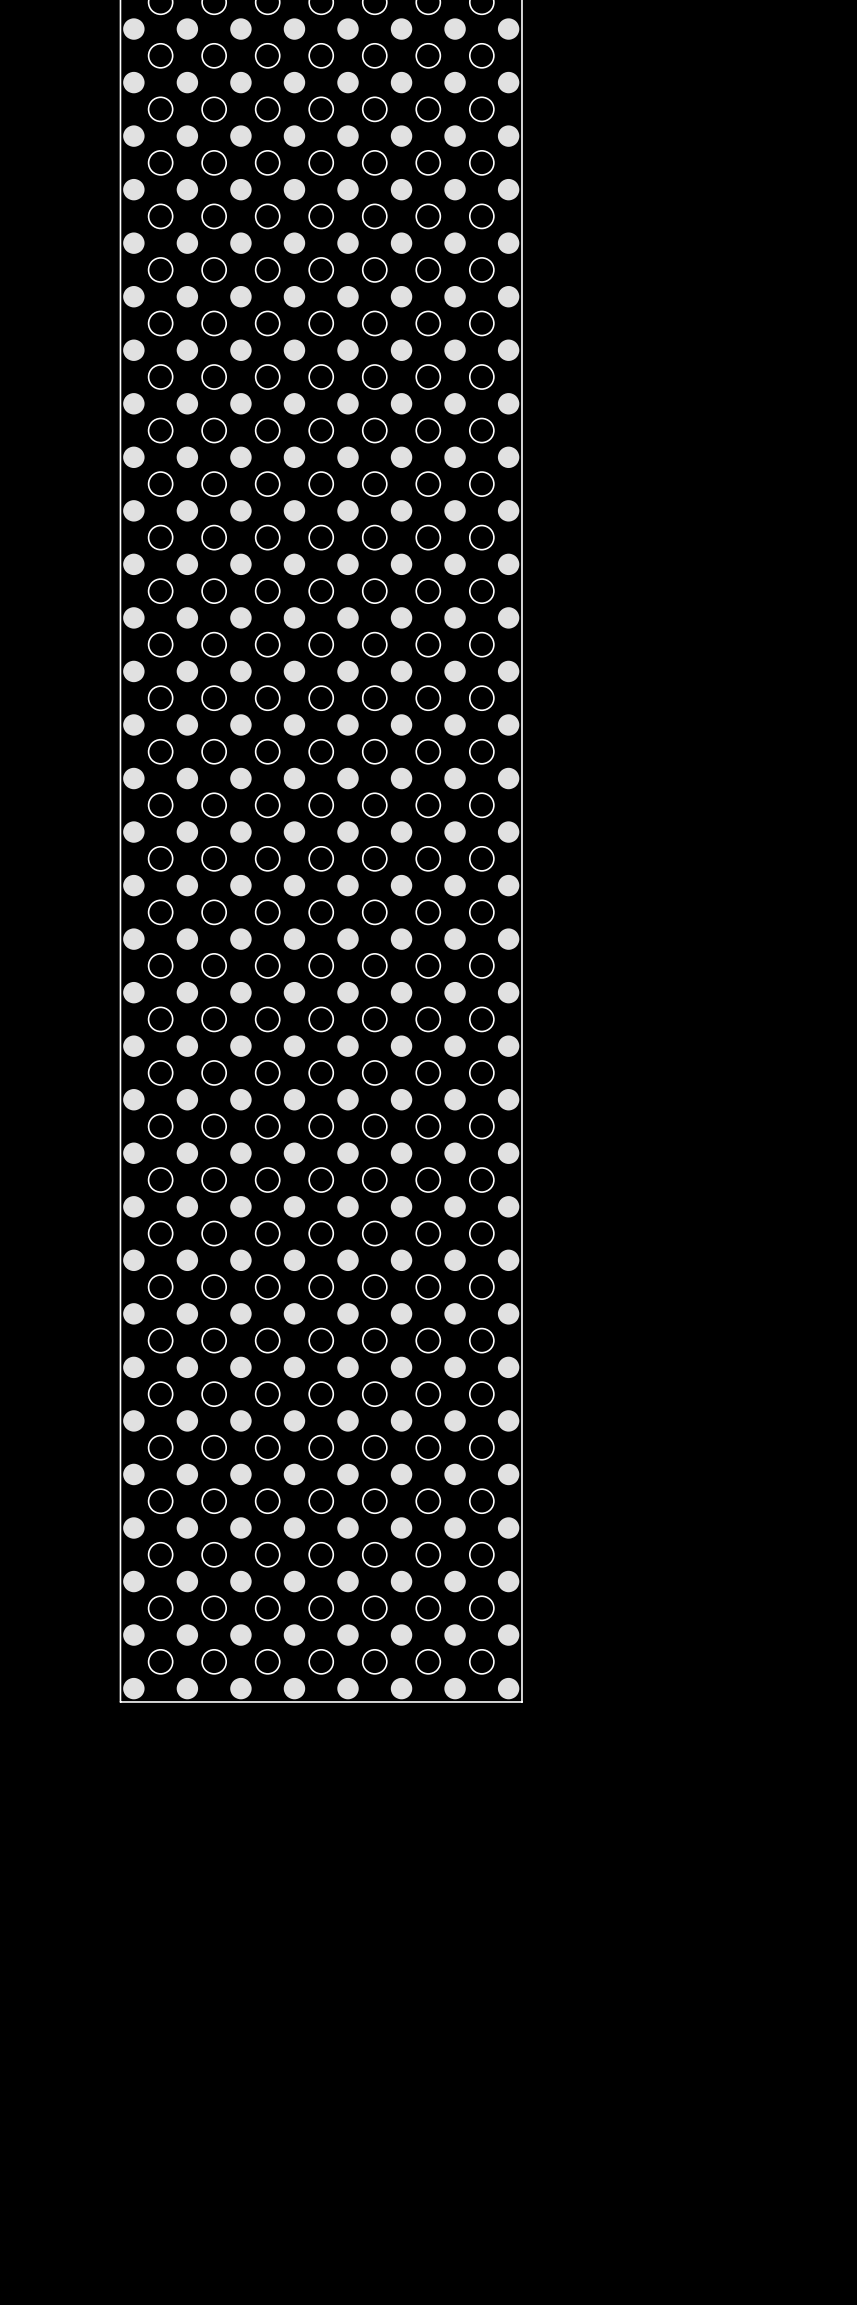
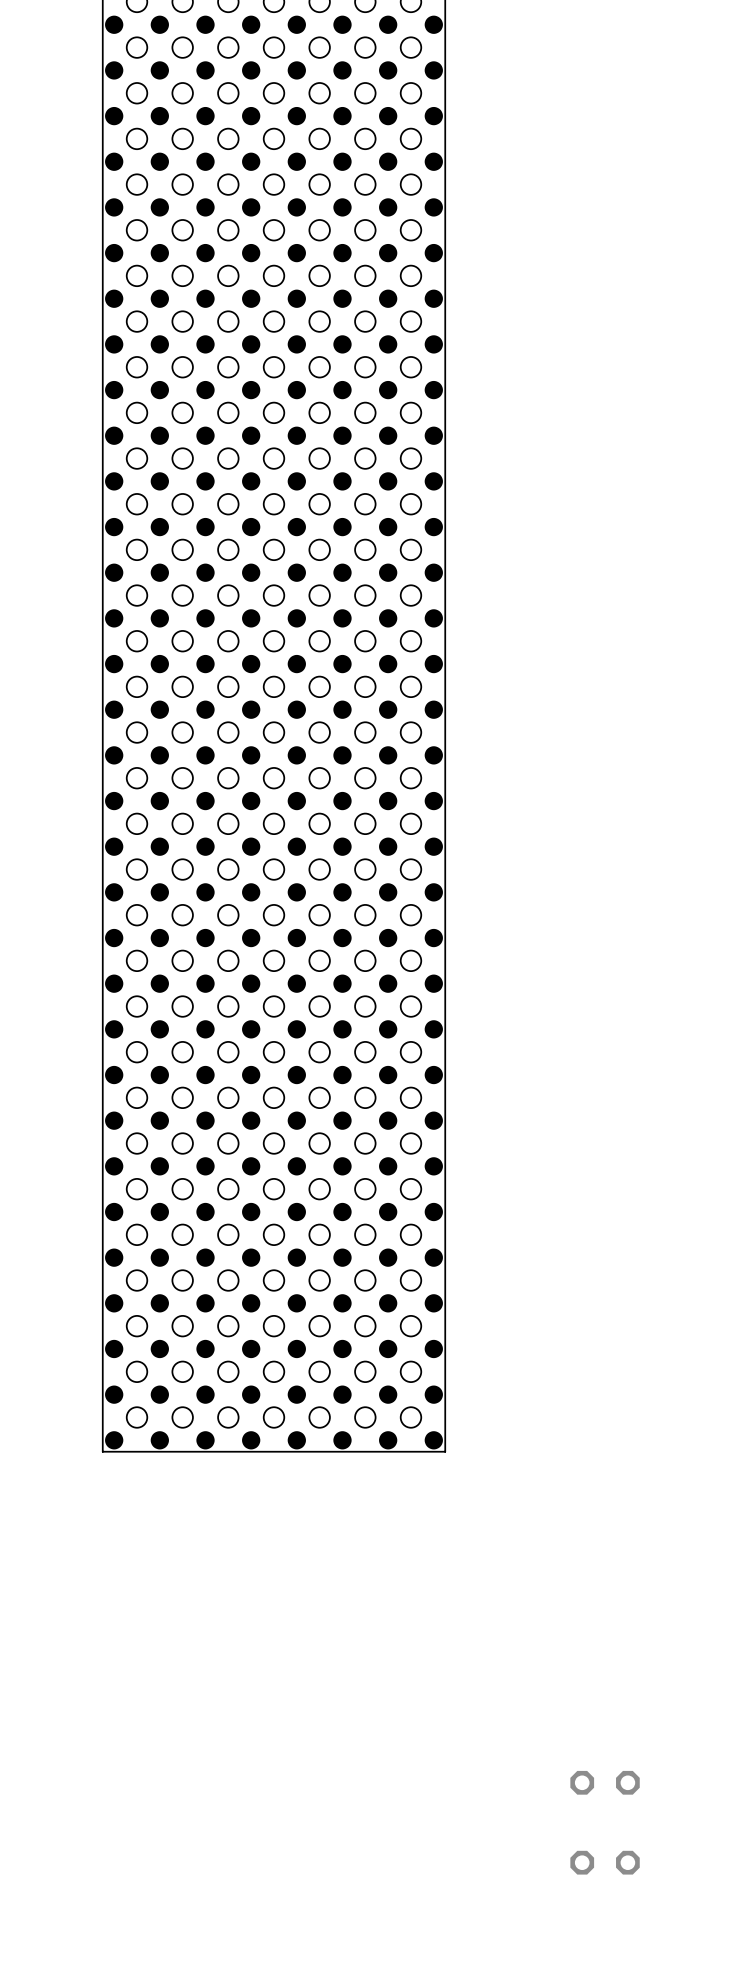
part: none -> (605, 1782)
part: none -> (605, 1862)

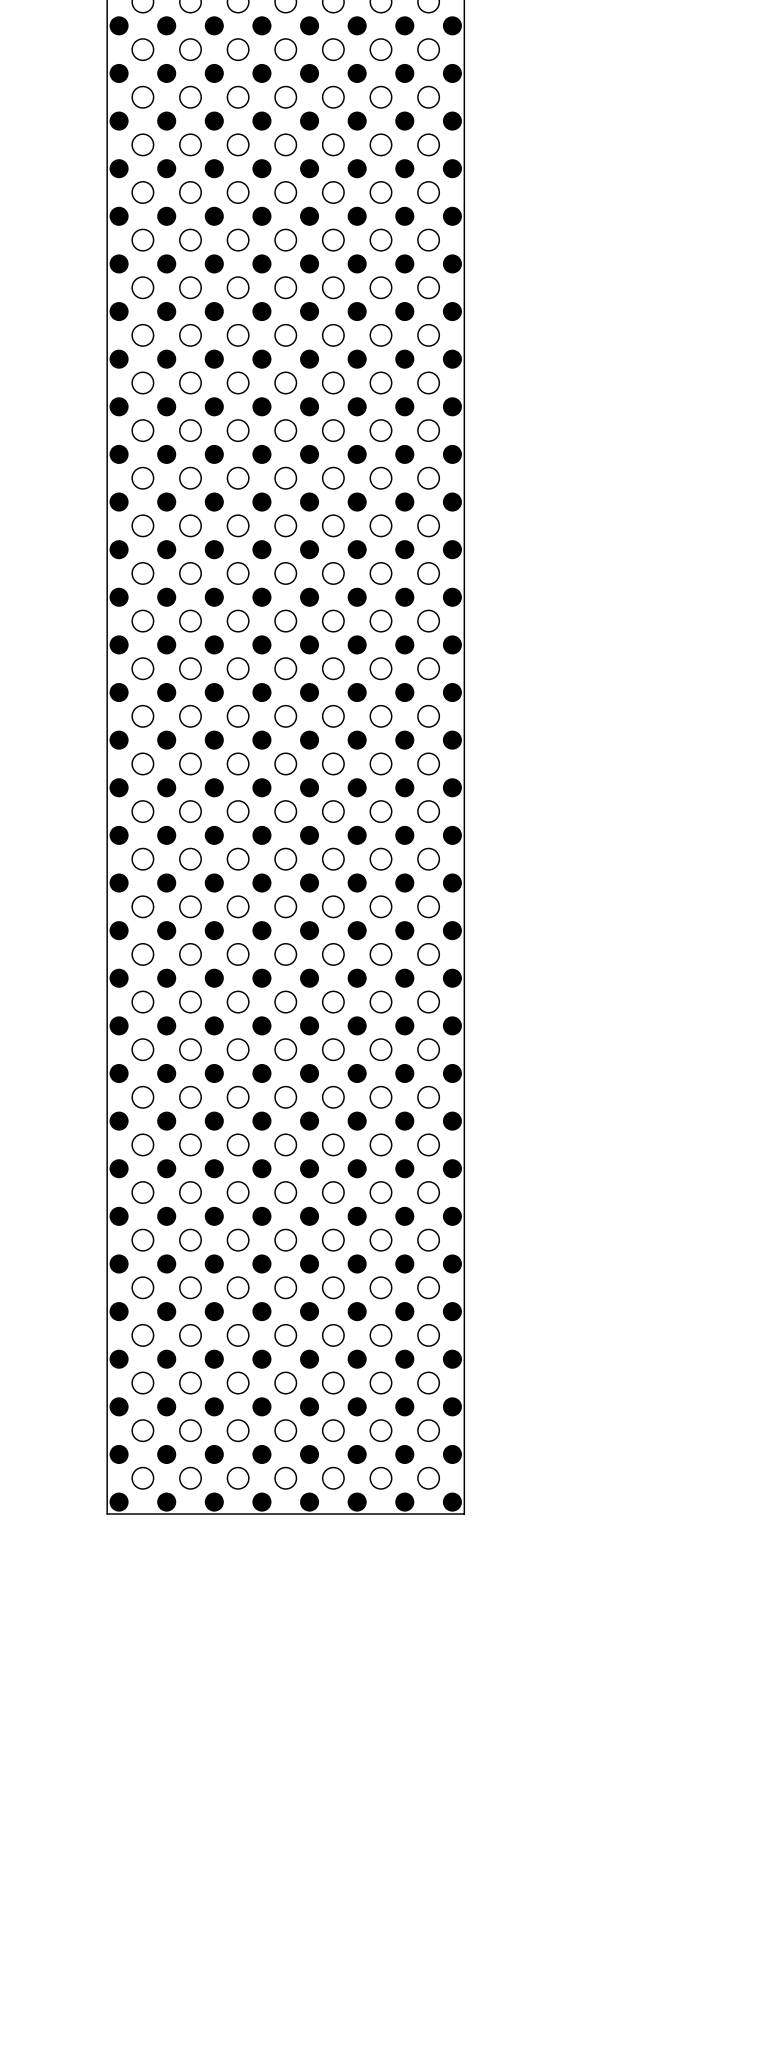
part: (605, 1782) -> none
part: (605, 1862) -> none

